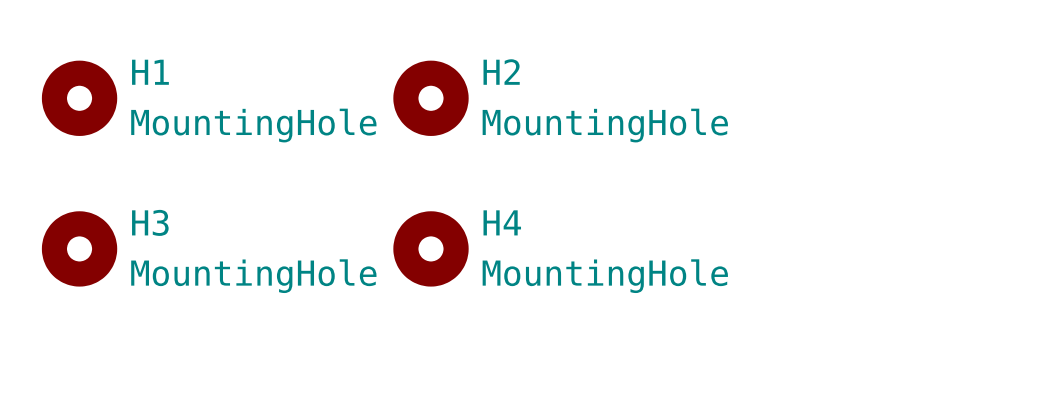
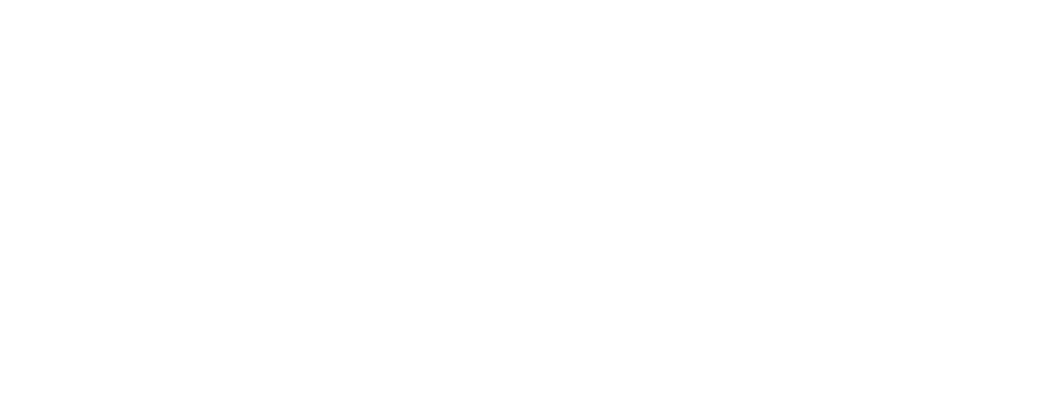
H1: MountingHole (79, 98) -> none
H2: MountingHole (430, 98) -> none
H3: MountingHole (79, 248) -> none
H4: MountingHole (430, 248) -> none

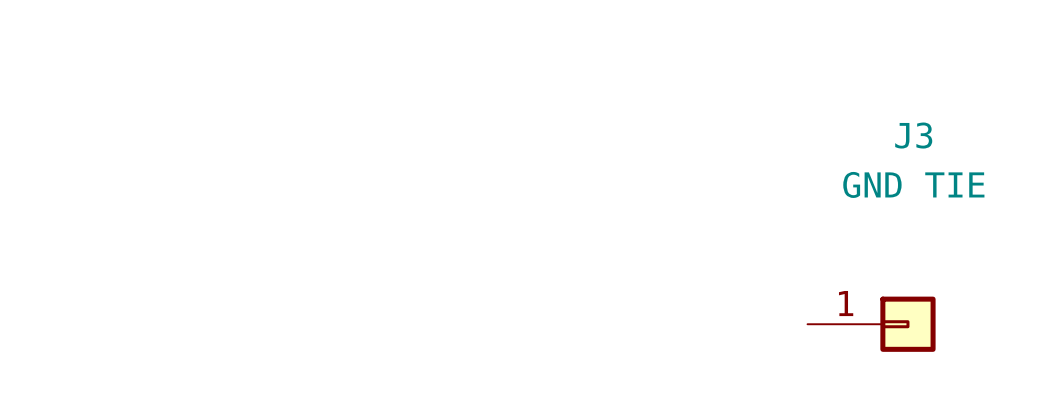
J3: none -> GND TIE (871, 324)

